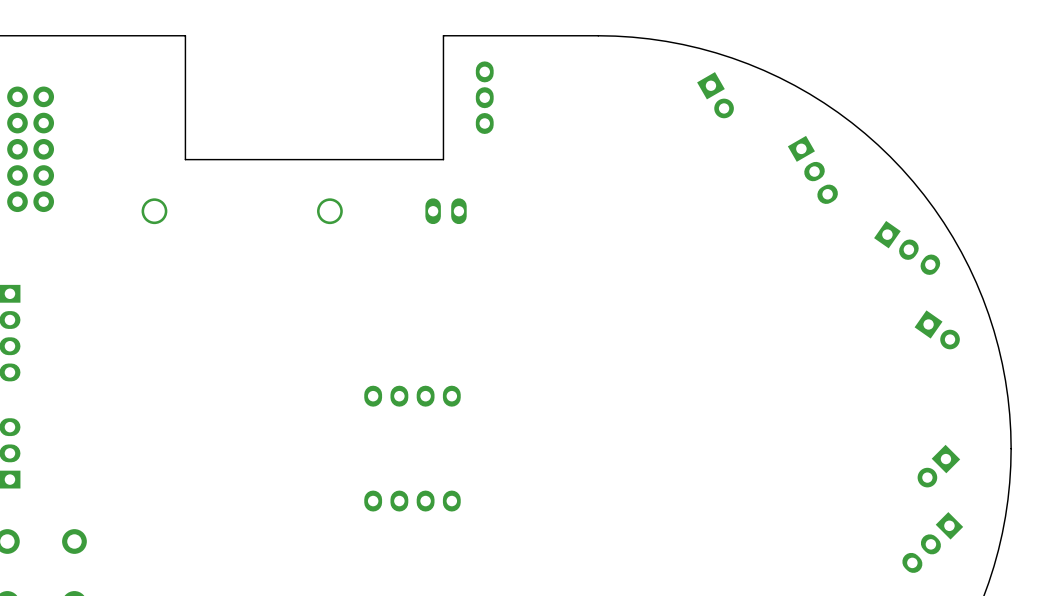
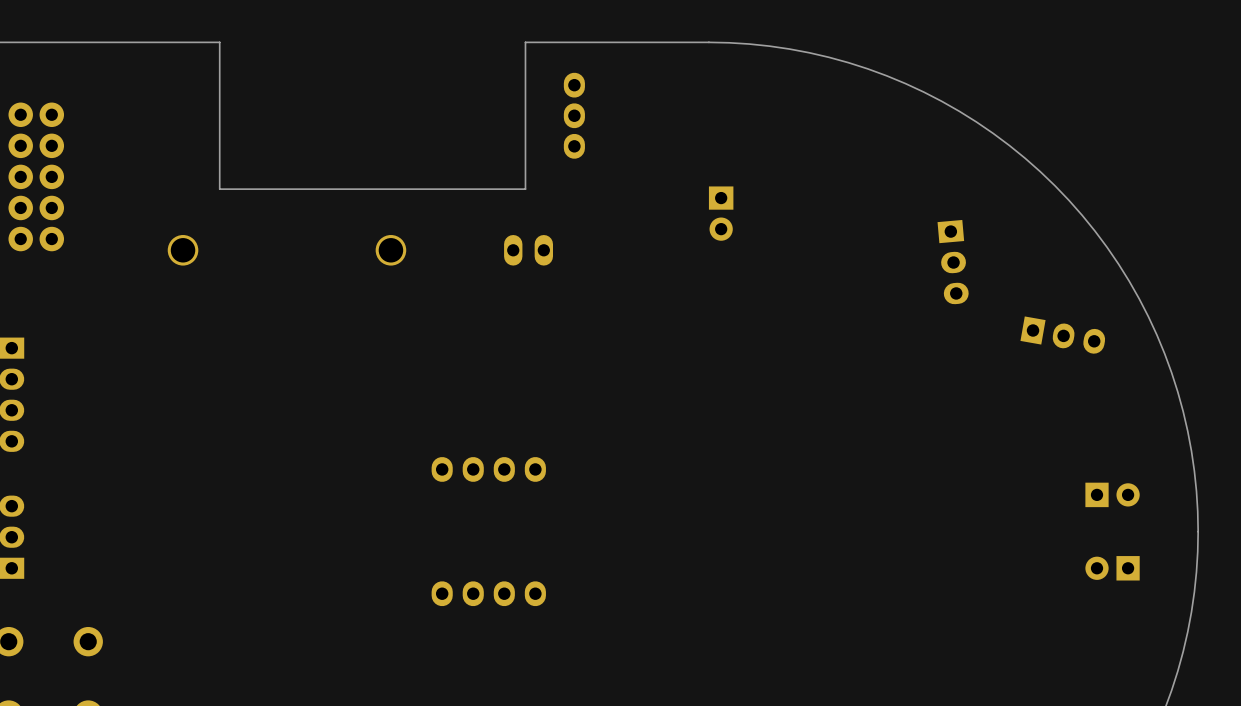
part: (715, 95) -> none
part: (812, 169) -> none
part: none -> (721, 213)
part: none -> (953, 262)
part: (907, 247) -> none
part: none -> (1062, 335)
part: (937, 329) -> none
part: none -> (1112, 494)
part: (938, 466) -> none
part: none -> (1112, 568)
part: (932, 542) -> none

